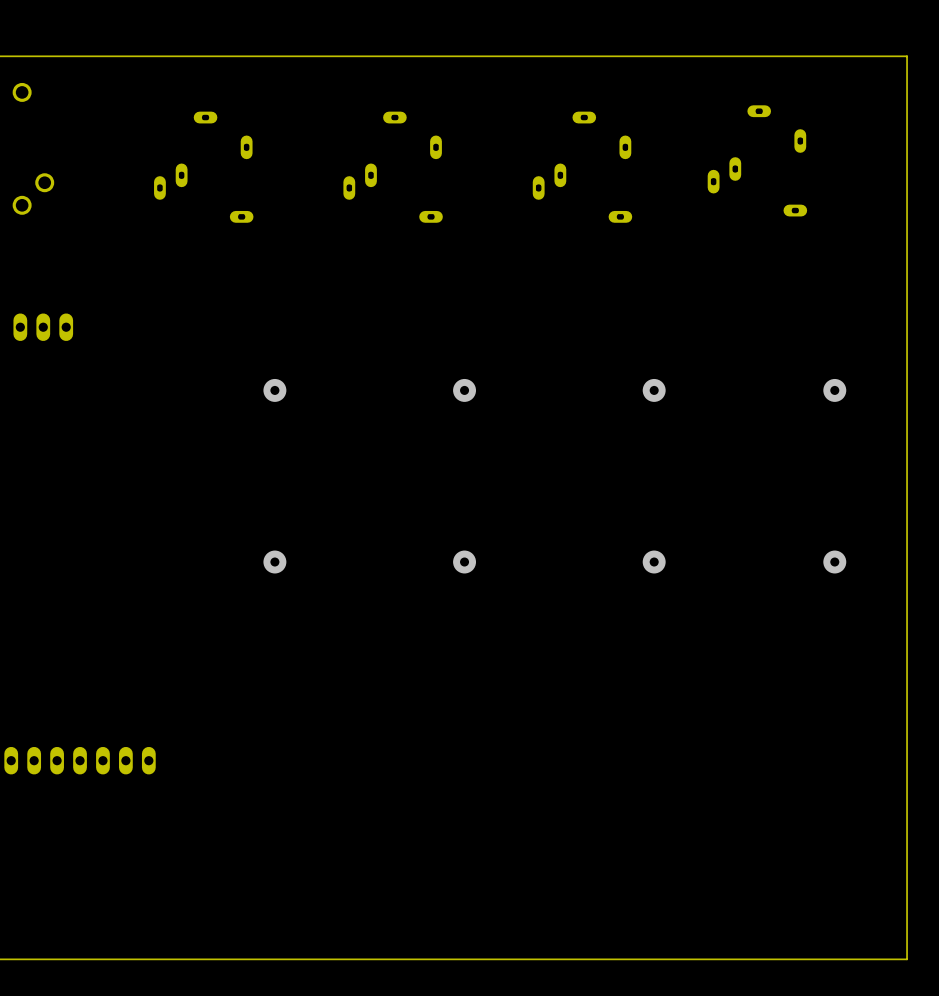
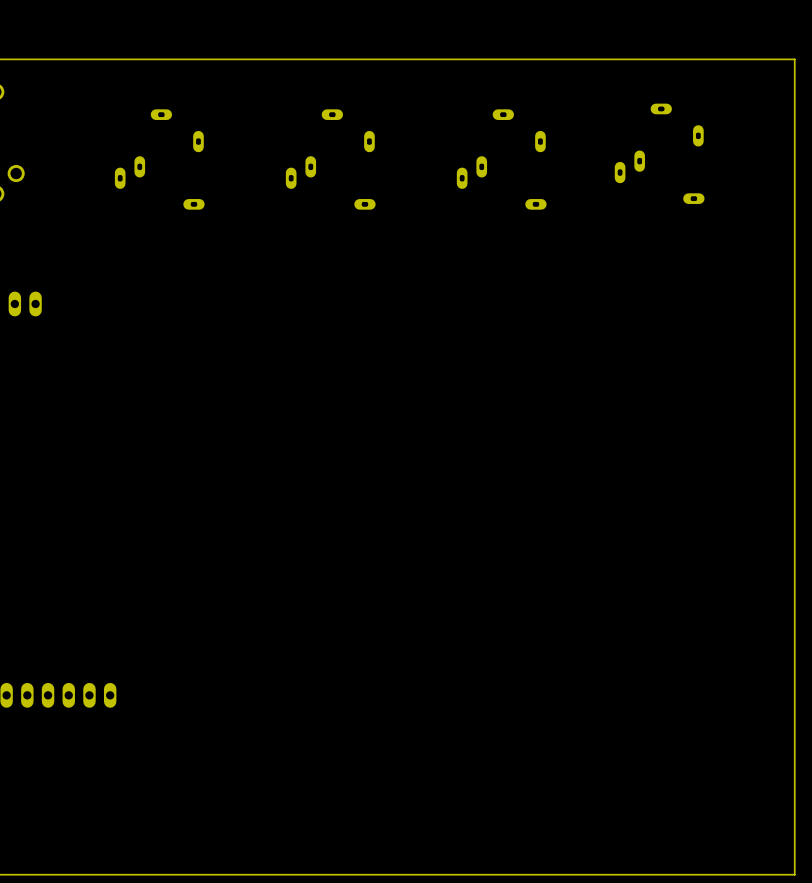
via: (274, 390) -> none
via: (464, 390) -> none
via: (654, 390) -> none
via: (834, 390) -> none
via: (274, 562) -> none
via: (464, 562) -> none
via: (654, 562) -> none
via: (834, 562) -> none

